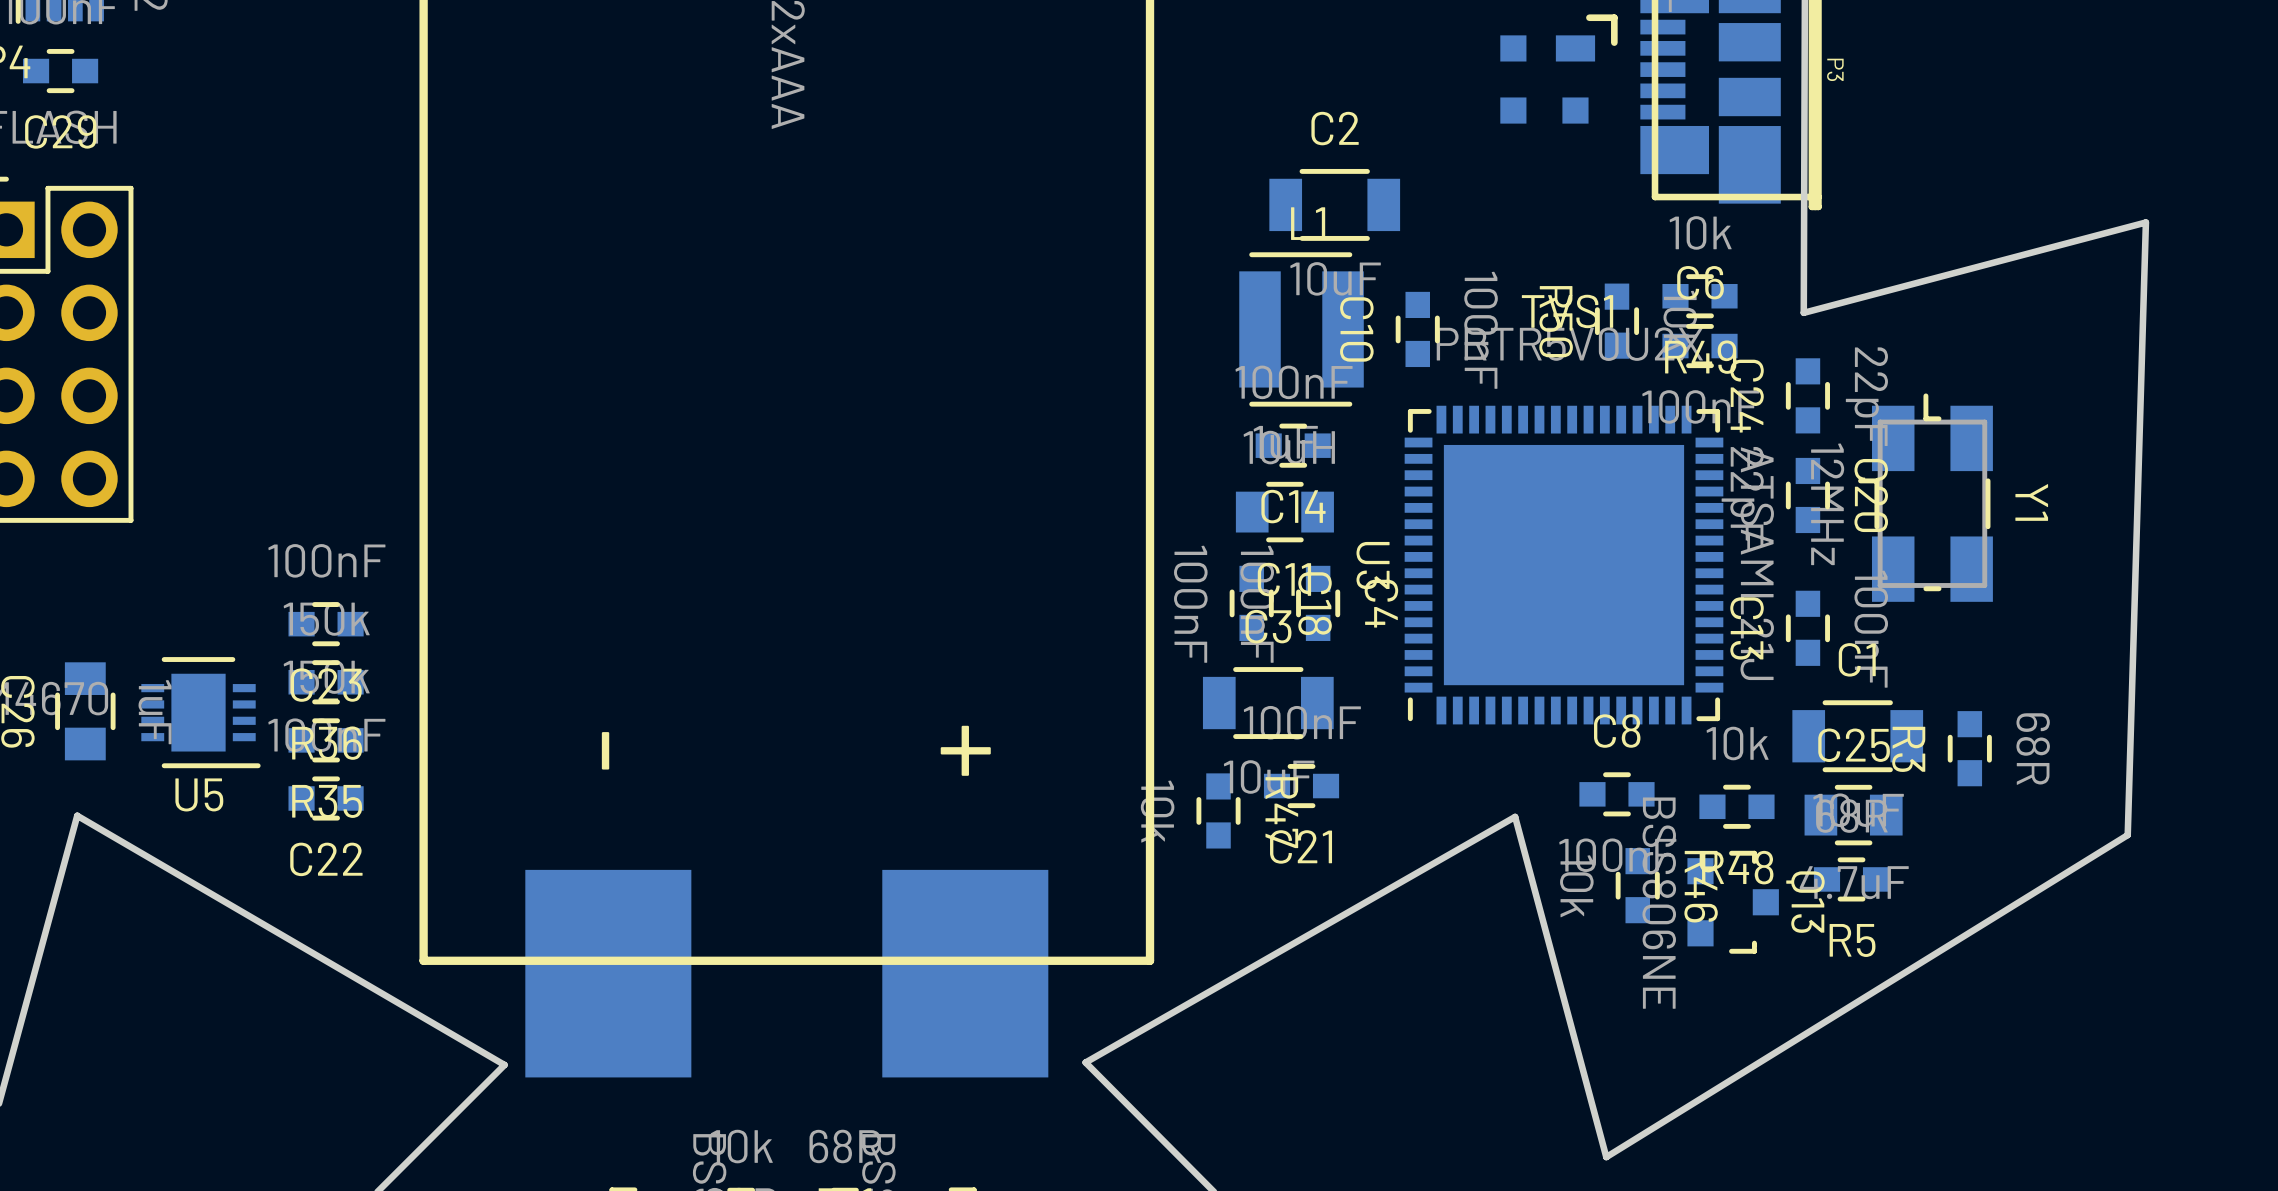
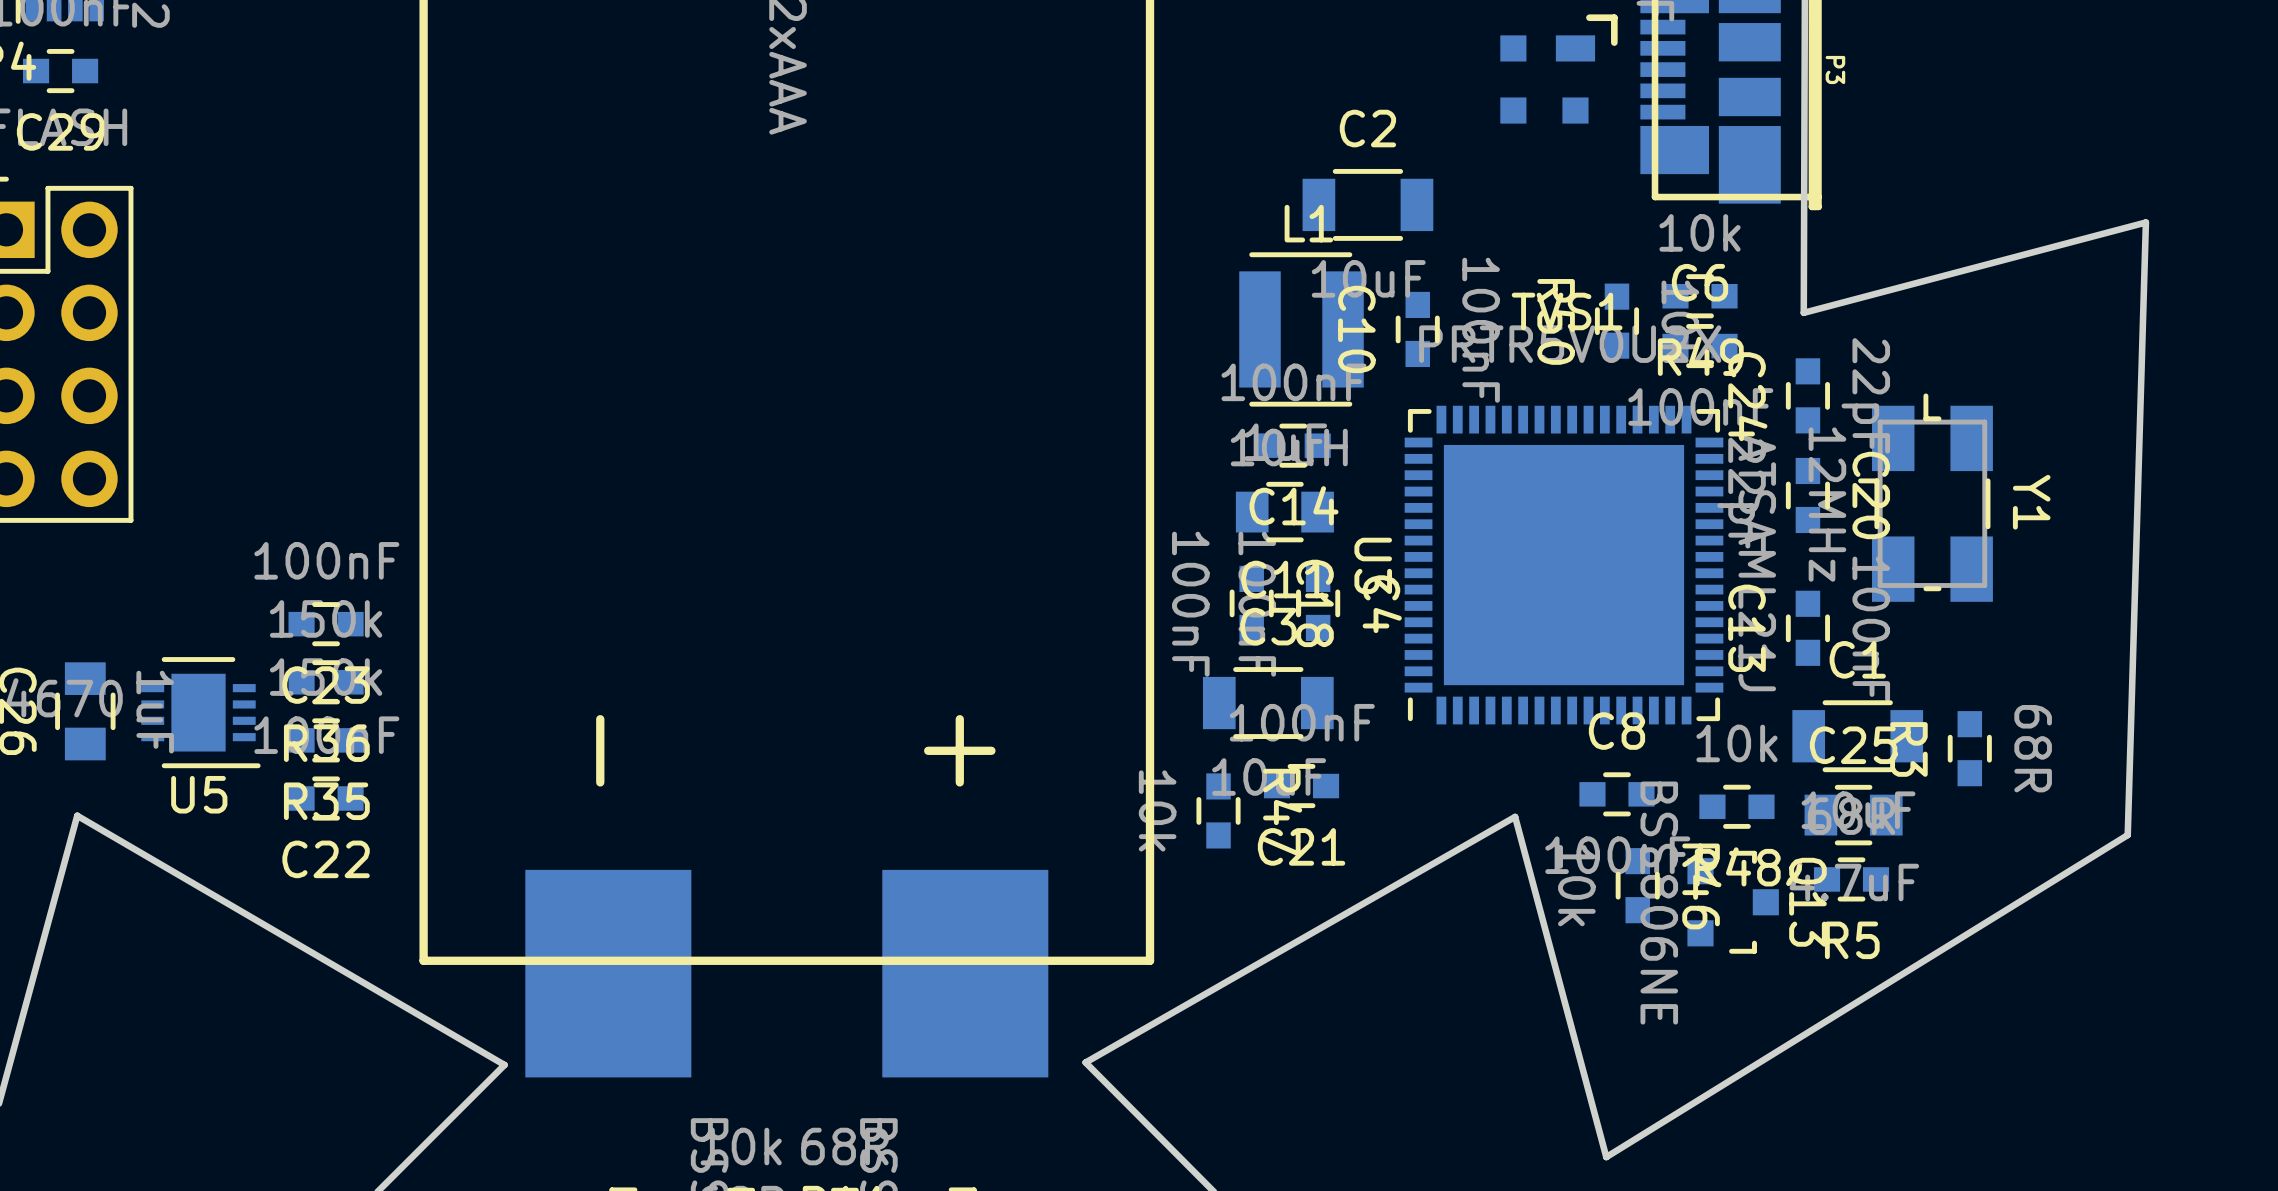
C2 position: (1334, 204) -> (1367, 204)

